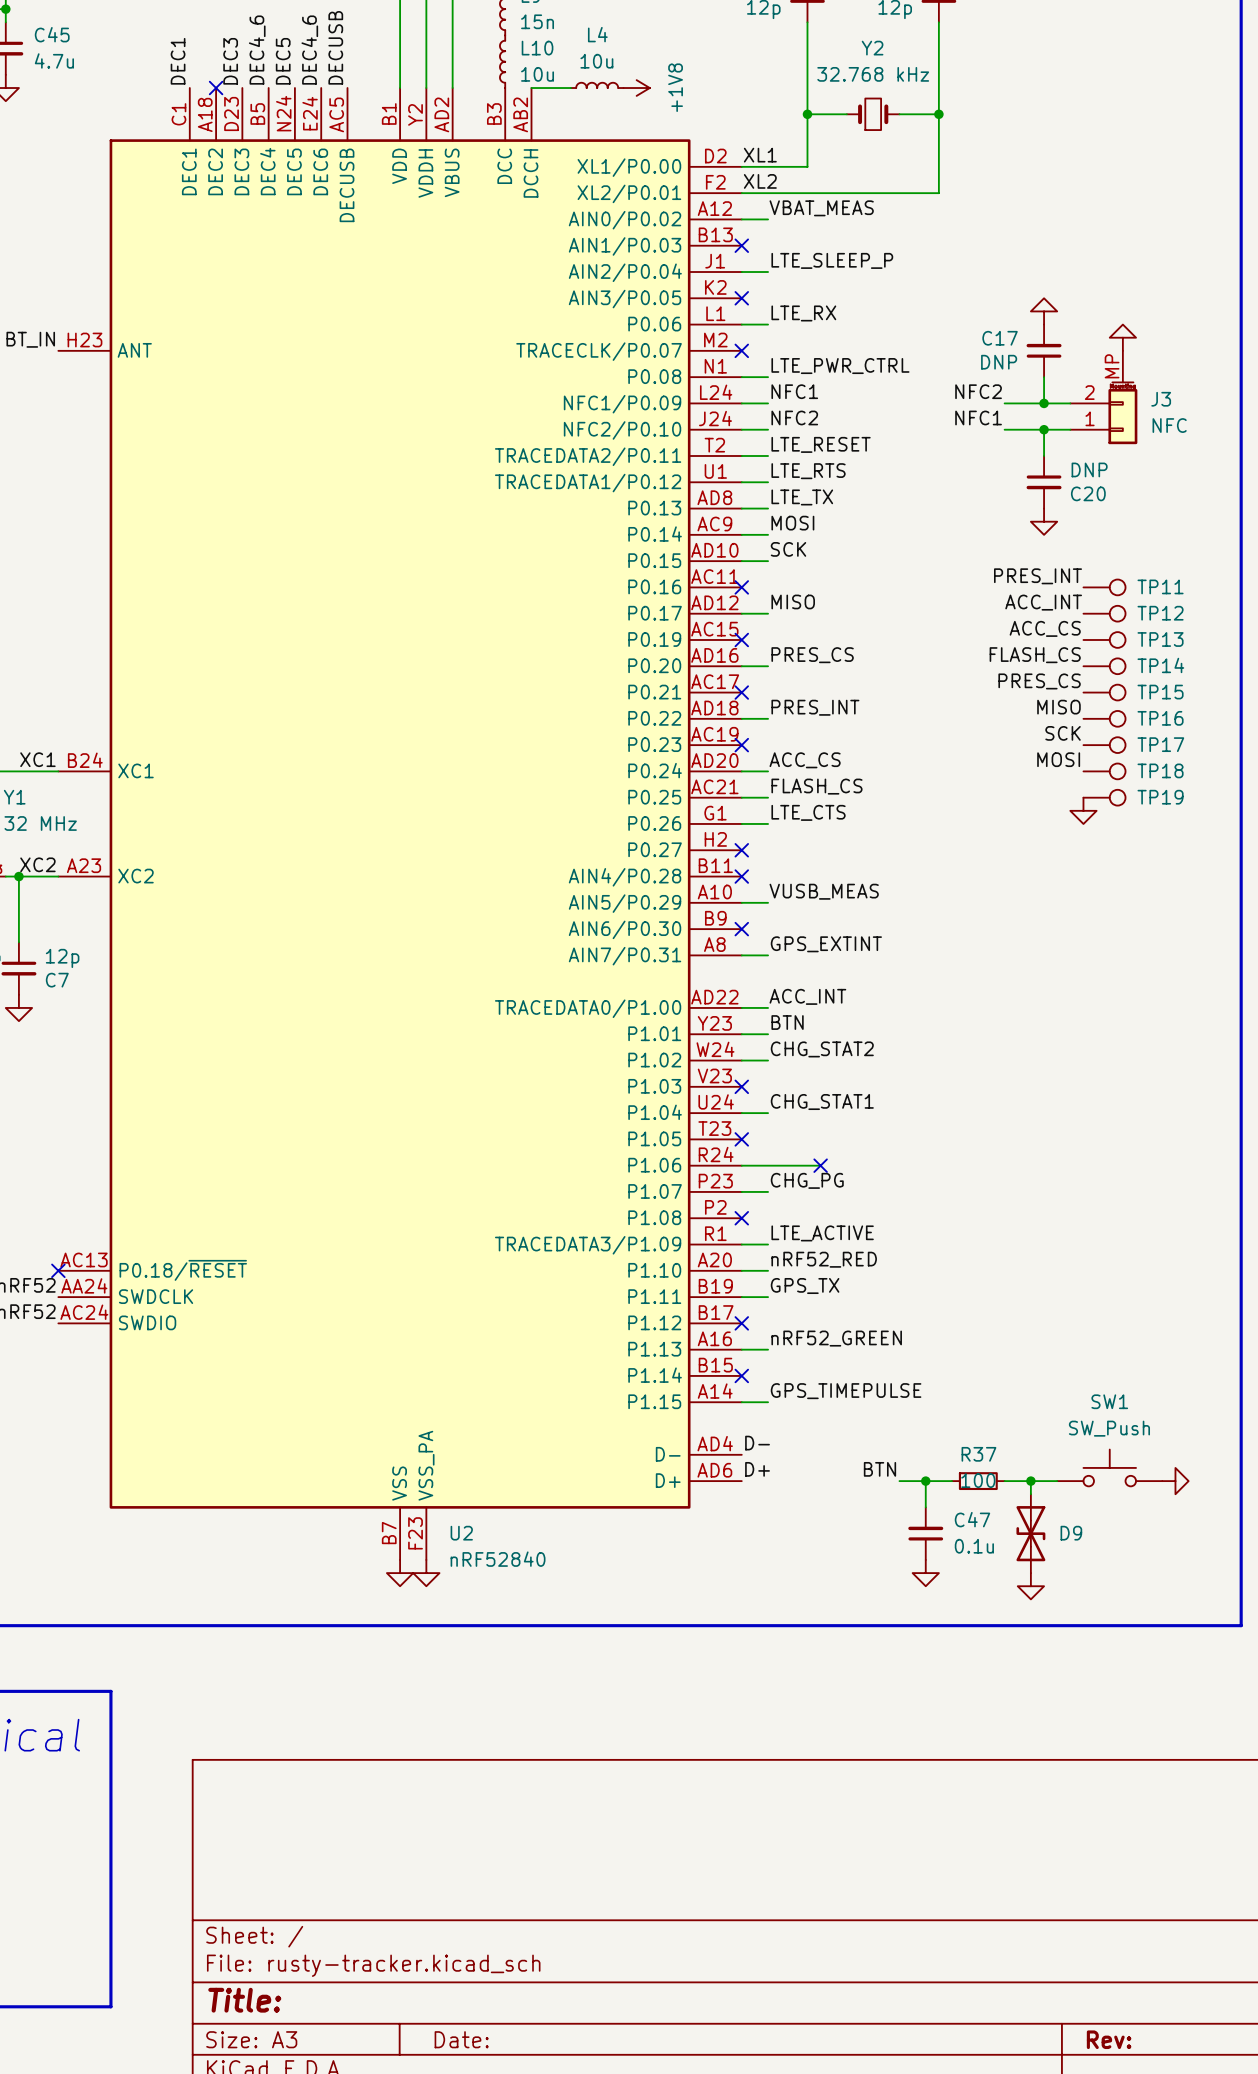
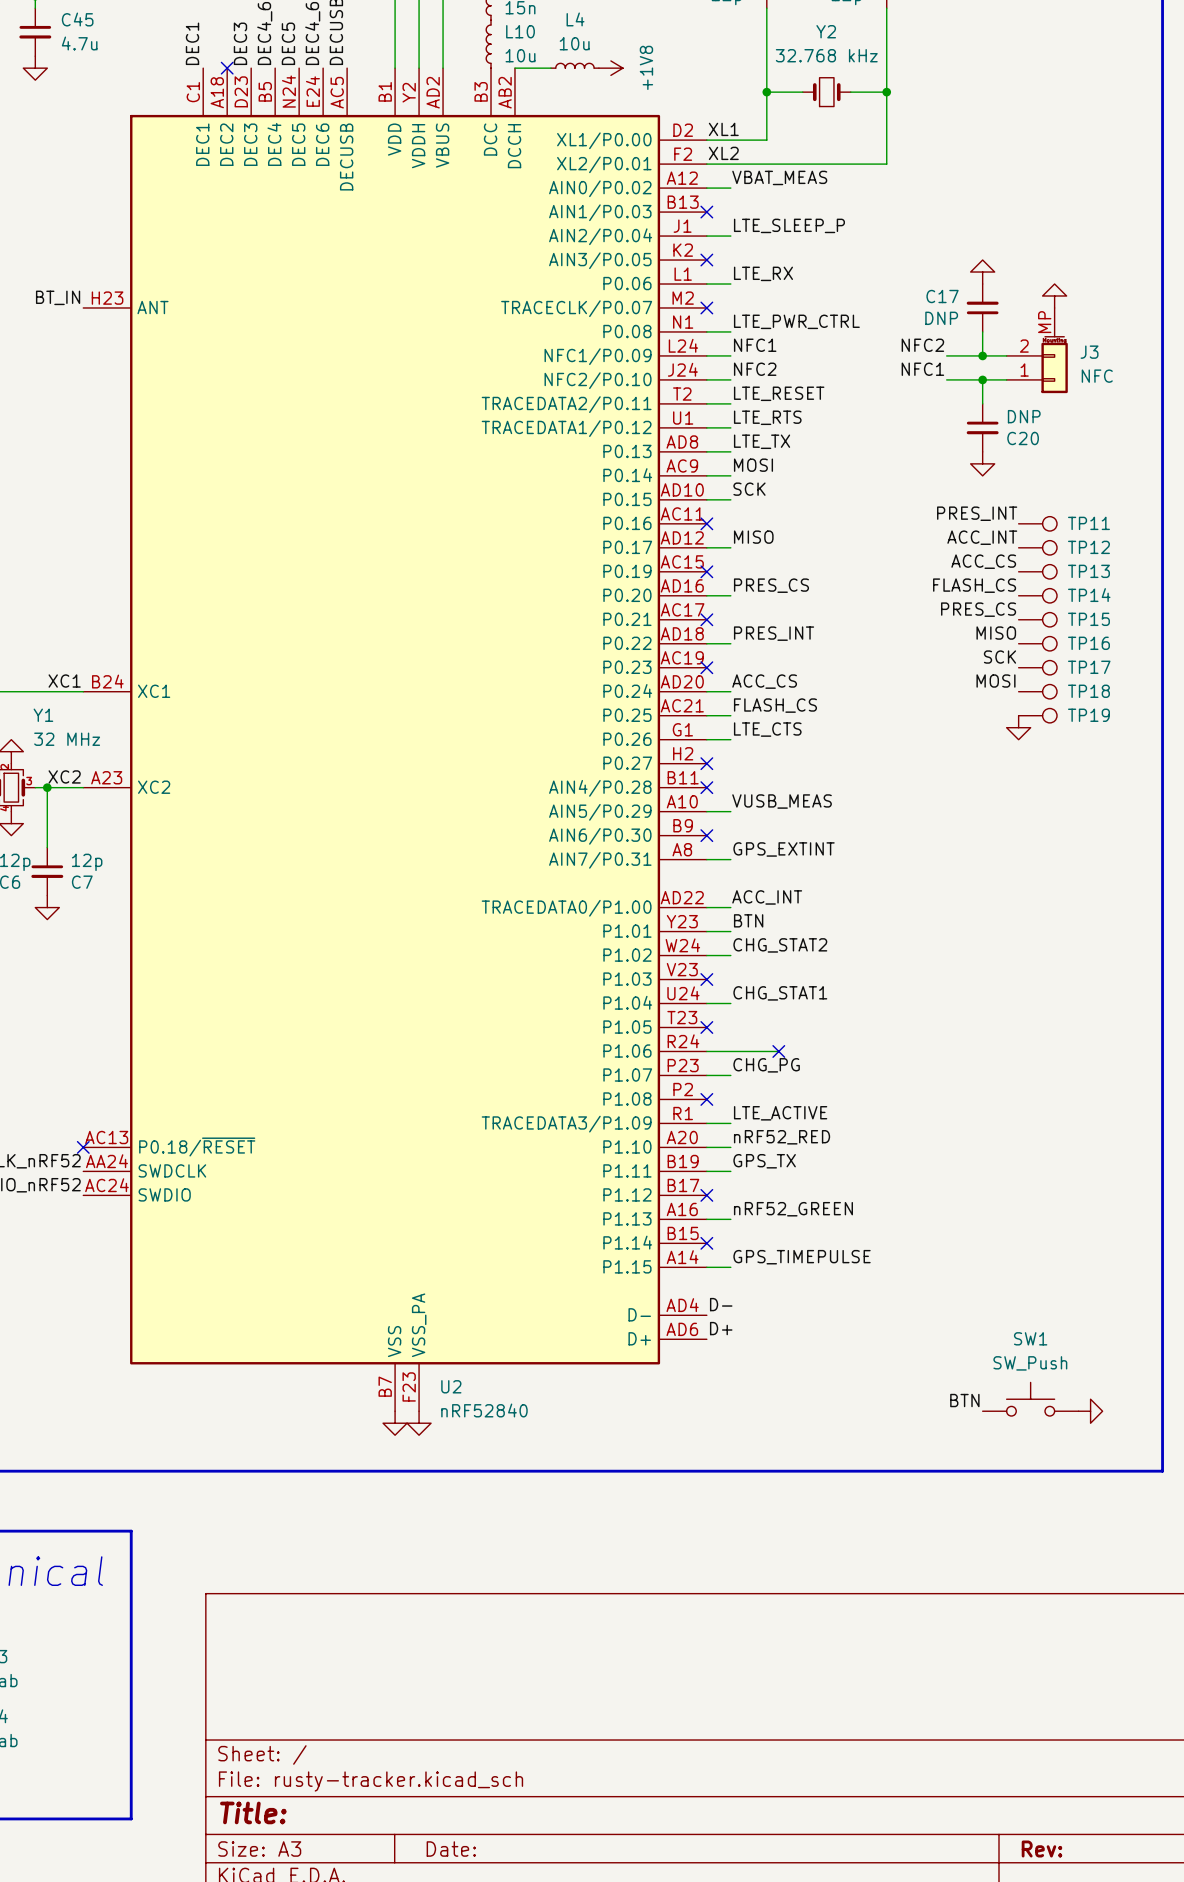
SW1 position: (1109, 1467) -> (1030, 1399)
label position: BTN (879, 1469) -> BTN (964, 1400)
wire: (899, 1481) (952, 1481) -> none
wire: (925, 1481) (925, 1507) -> none
junction: (925, 1481) -> none
R37: 100 (978, 1481) -> none
wire: (1004, 1481) (1057, 1481) -> none
wire: (1030, 1481) (1030, 1494) -> none
junction: (1030, 1481) -> none
power symbol: (1175, 1481) -> none
C47: 0.1u (925, 1533) -> none
D9: (1030, 1533) -> none
power symbol: none -> (1090, 1411)
power symbol: (925, 1573) -> none
power symbol: (1030, 1586) -> none

